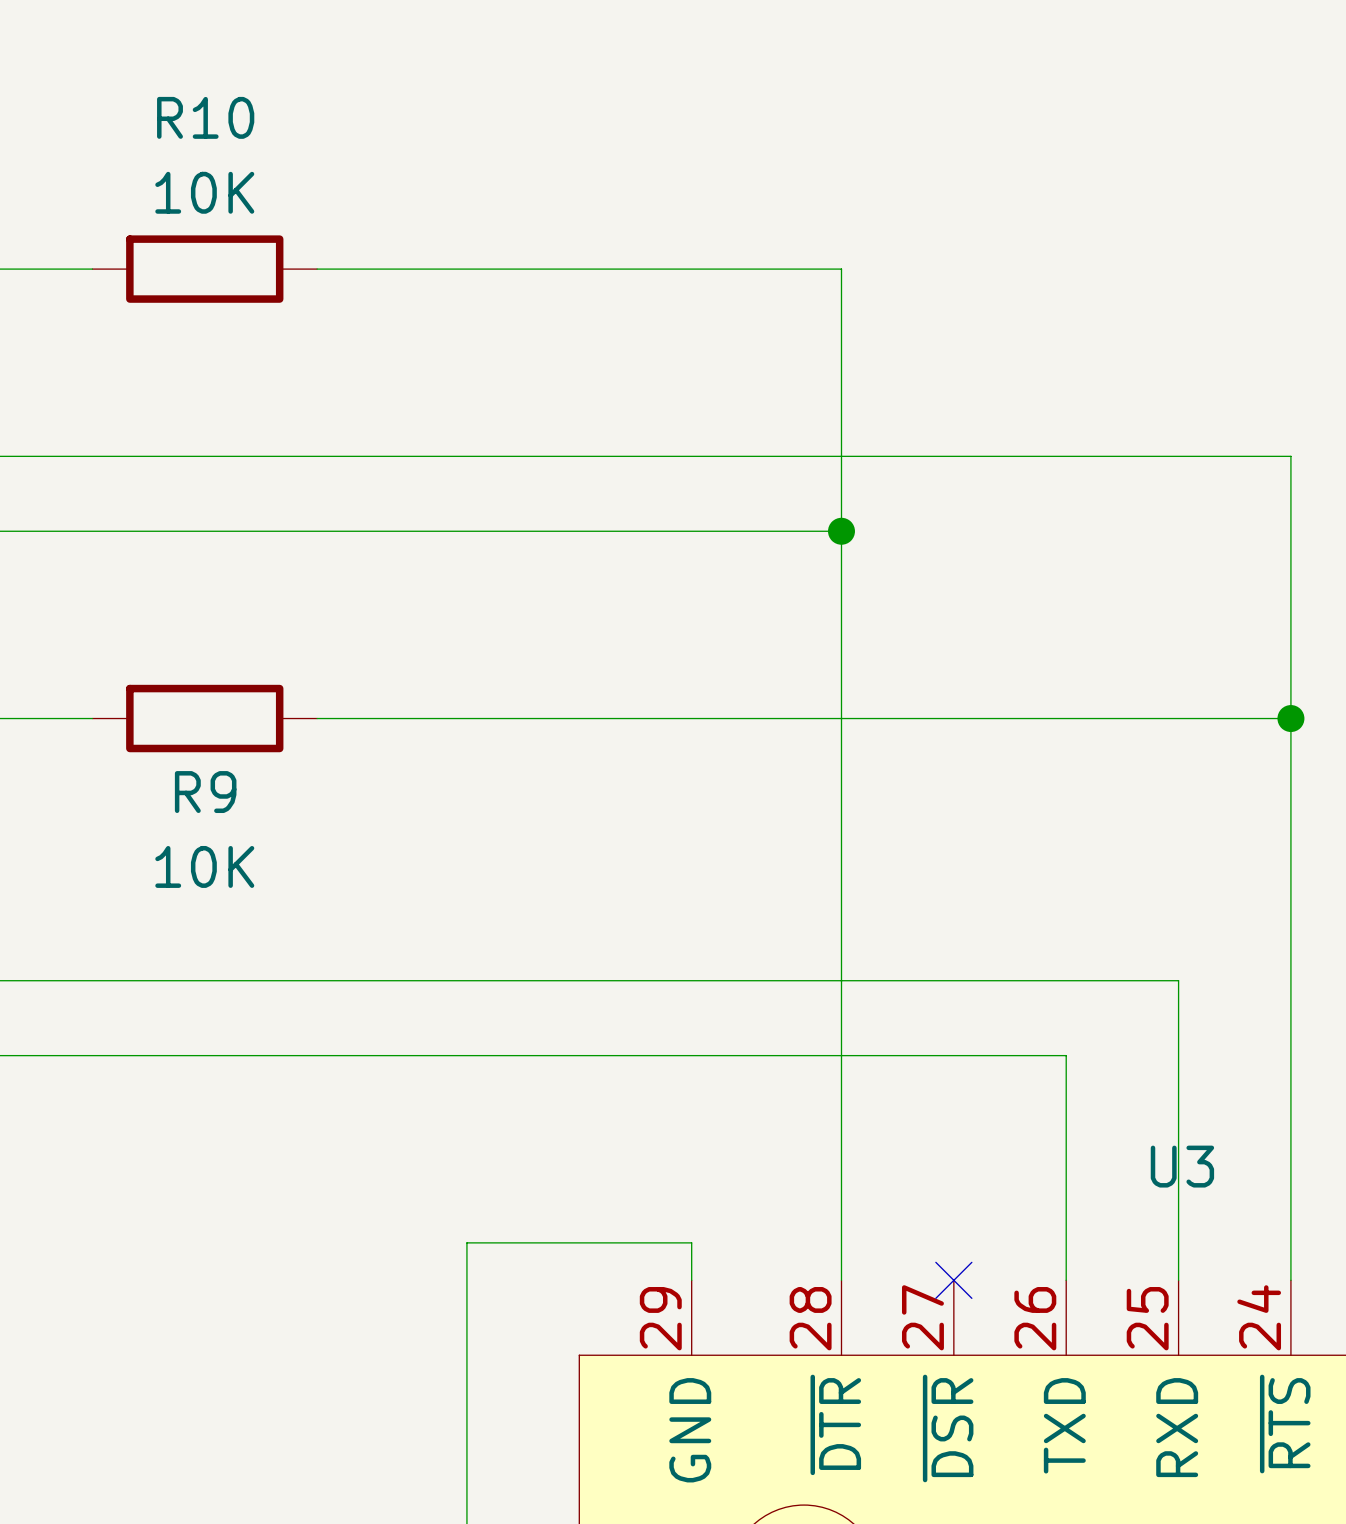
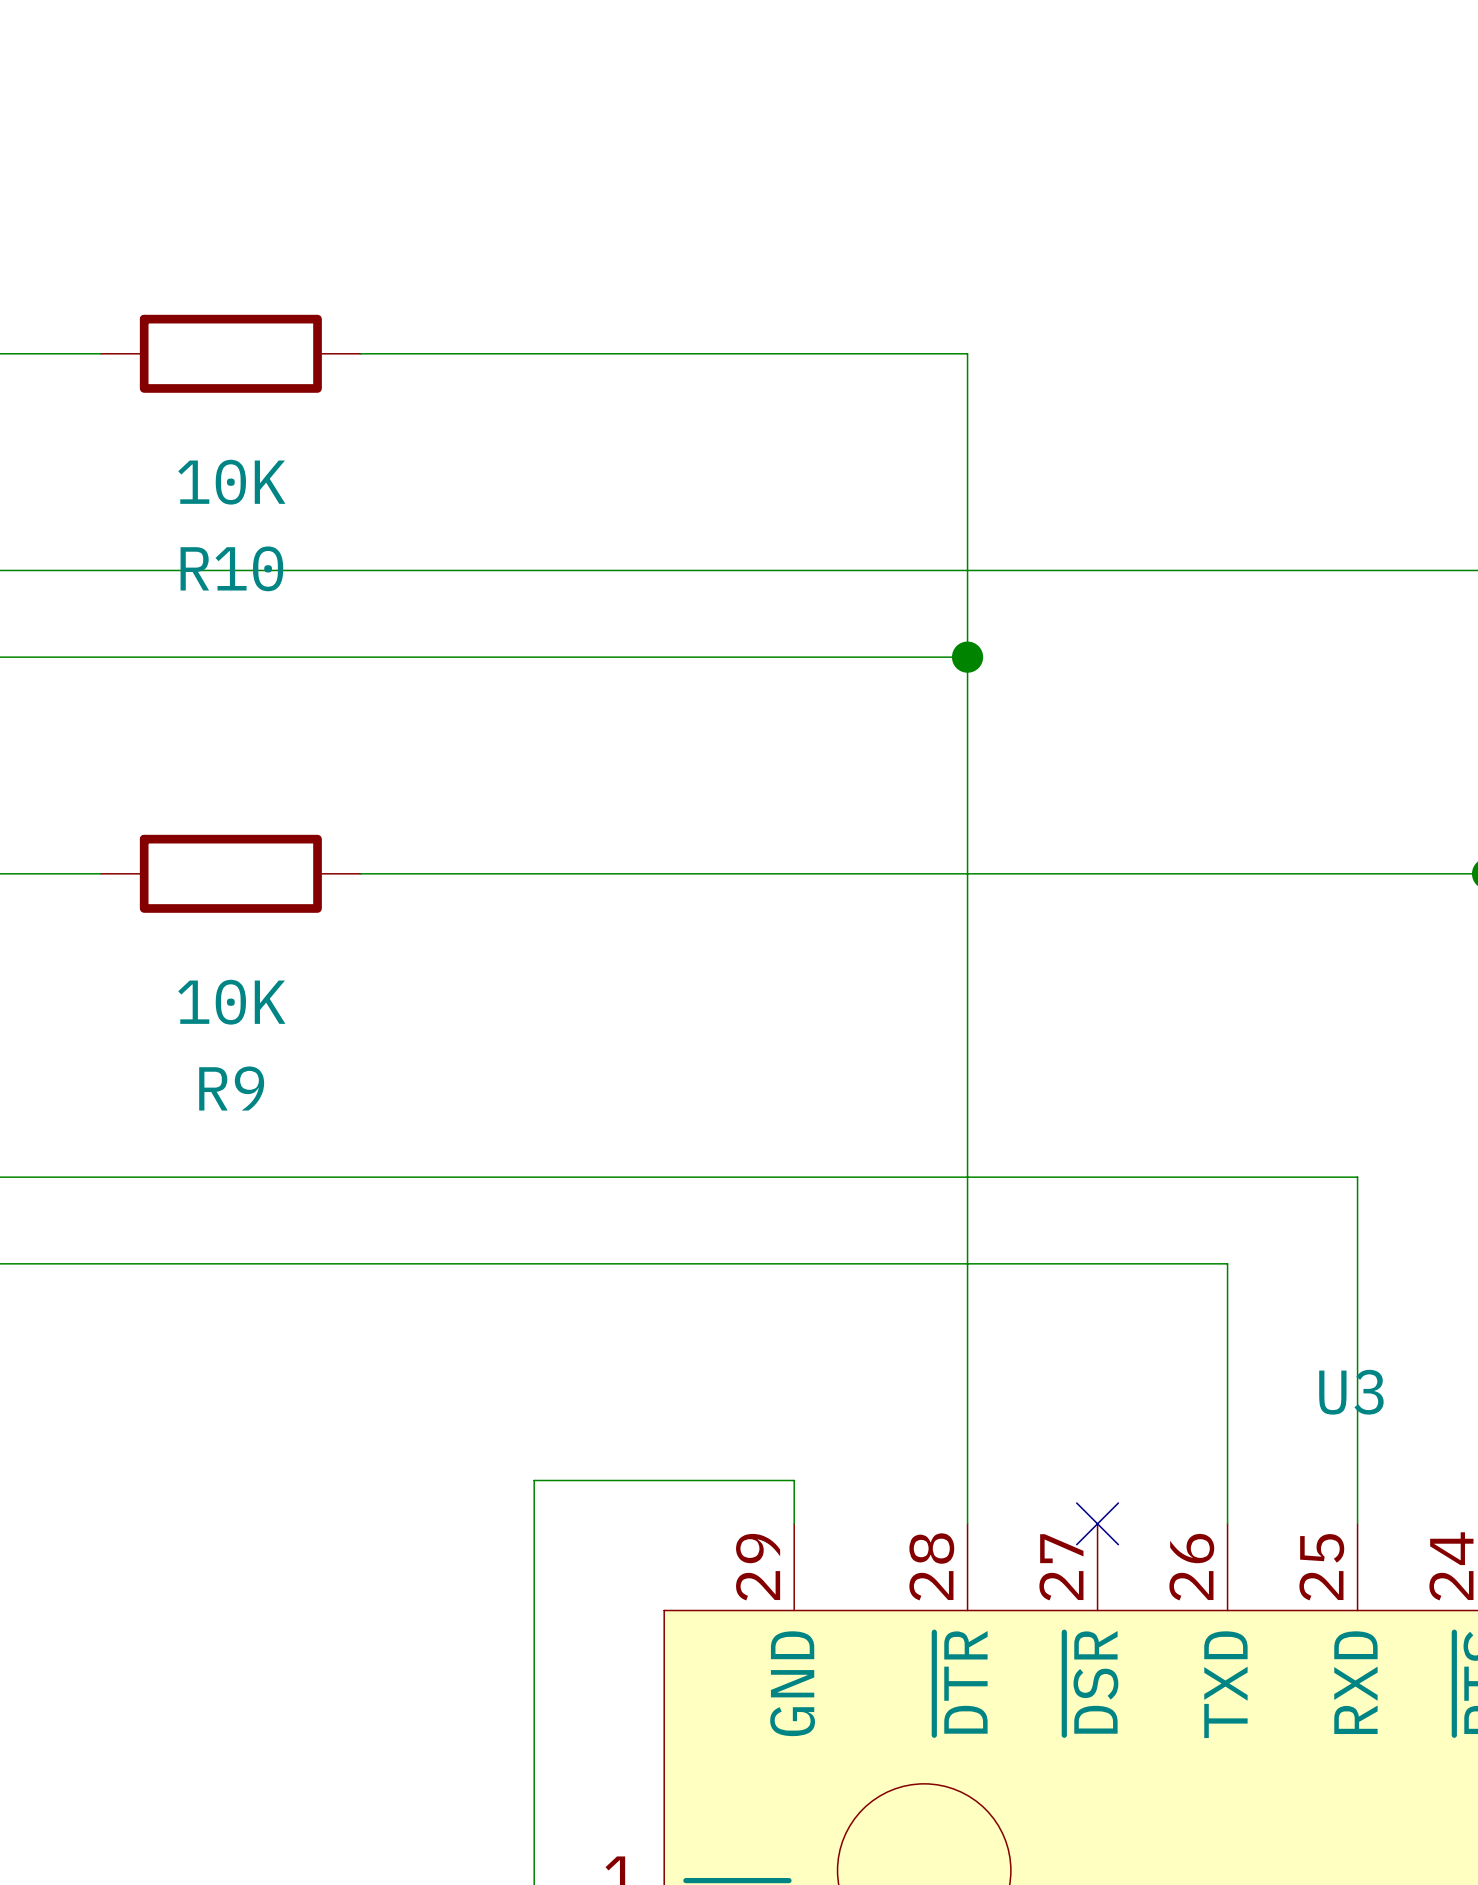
R10 name position: R10 (205, 117) -> R10 (231, 568)
R10 value position: 10K (204, 192) -> 10K (231, 482)
R9 name position: R9 (205, 792) -> R9 (231, 1088)
R9 value position: 10K (204, 866) -> 10K (231, 1002)

